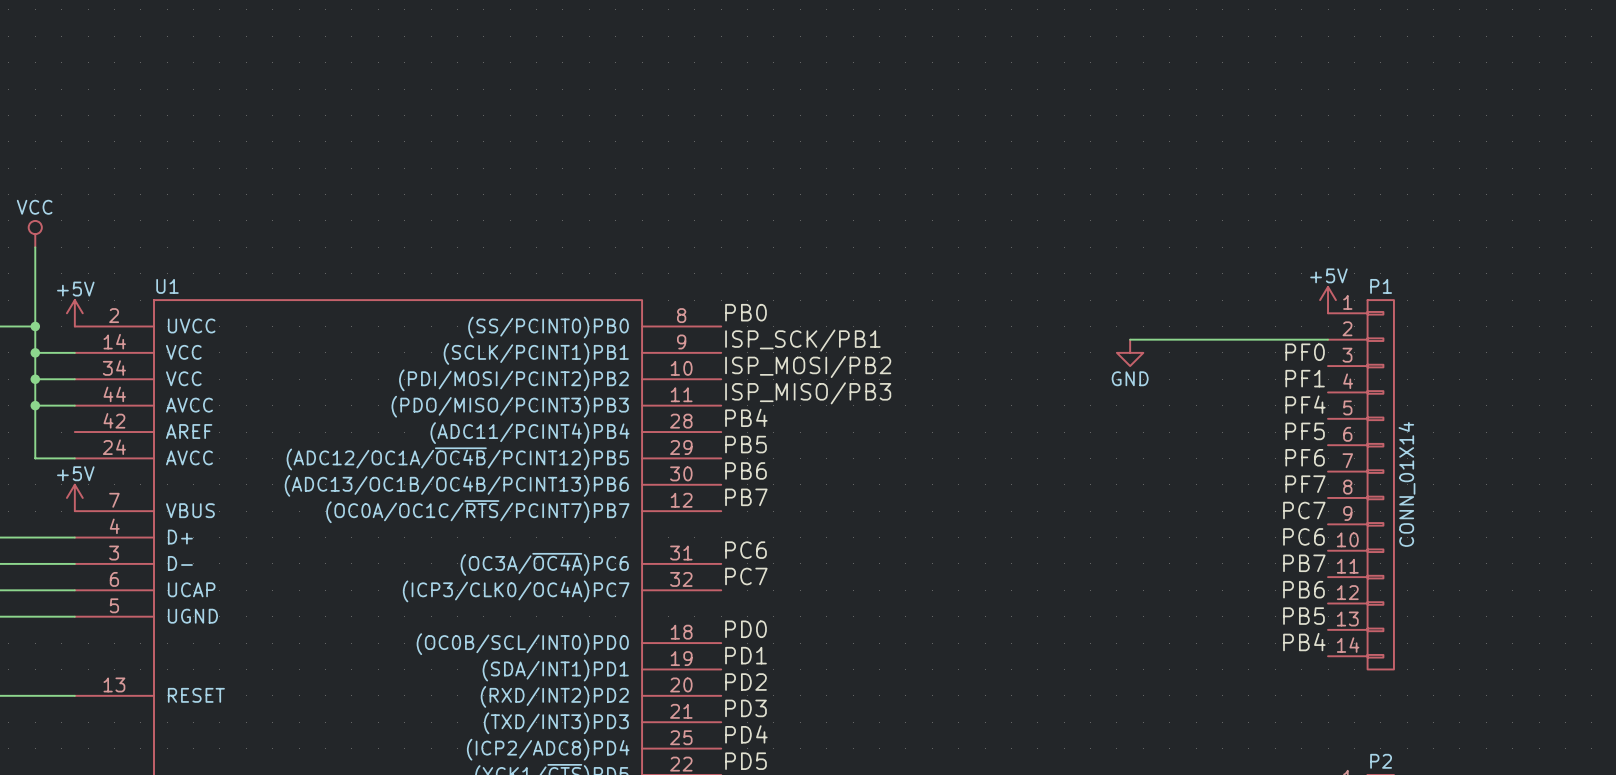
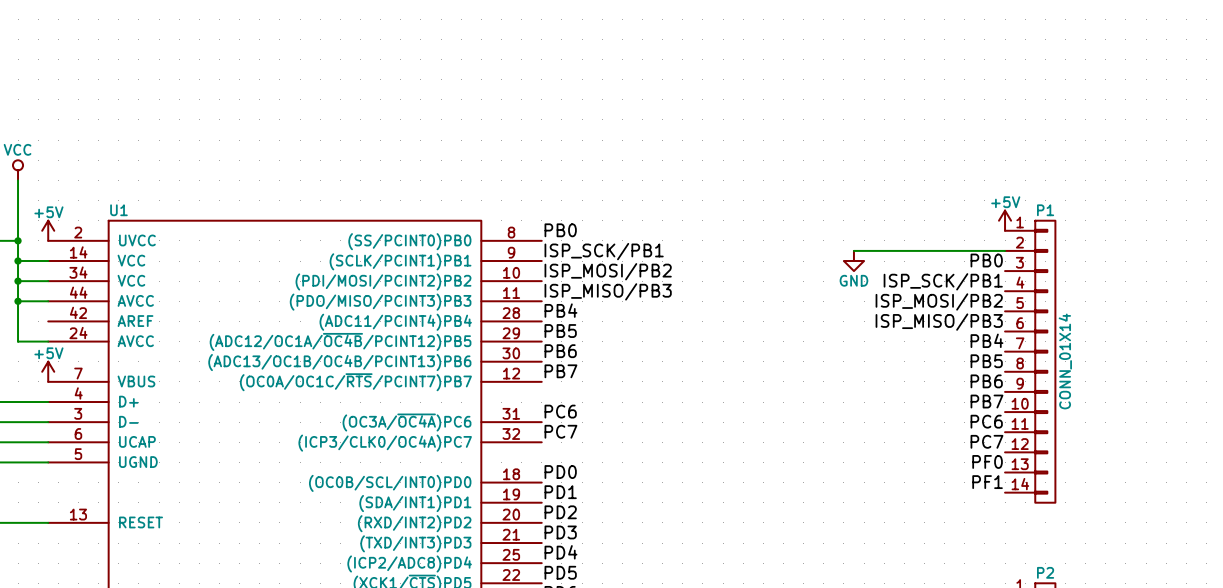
label: PF0 (1305, 352) -> PB0 (986, 260)
label: PF1 (1305, 378) -> ISP_SCK/PB1 (943, 281)
label: PF4 (1305, 404) -> ISP_MOSI/PB2 (939, 301)
label: PF5 (1305, 431) -> ISP_MISO/PB3 (939, 322)
label: PF6 (1305, 457) -> PB4 (986, 340)
label: PF7 (1305, 484) -> PB5 (986, 361)
label: PC7 (1304, 510) -> PB6 (986, 381)
label: PC6 (1303, 536) -> PB7 (986, 401)
label: PB7 (1304, 563) -> PC6 (986, 421)
label: PB6 (1303, 589) -> PC7 (986, 441)
label: PB5 (1303, 616) -> PF0 (987, 461)
label: PB4 (1304, 642) -> PF1 (987, 482)

